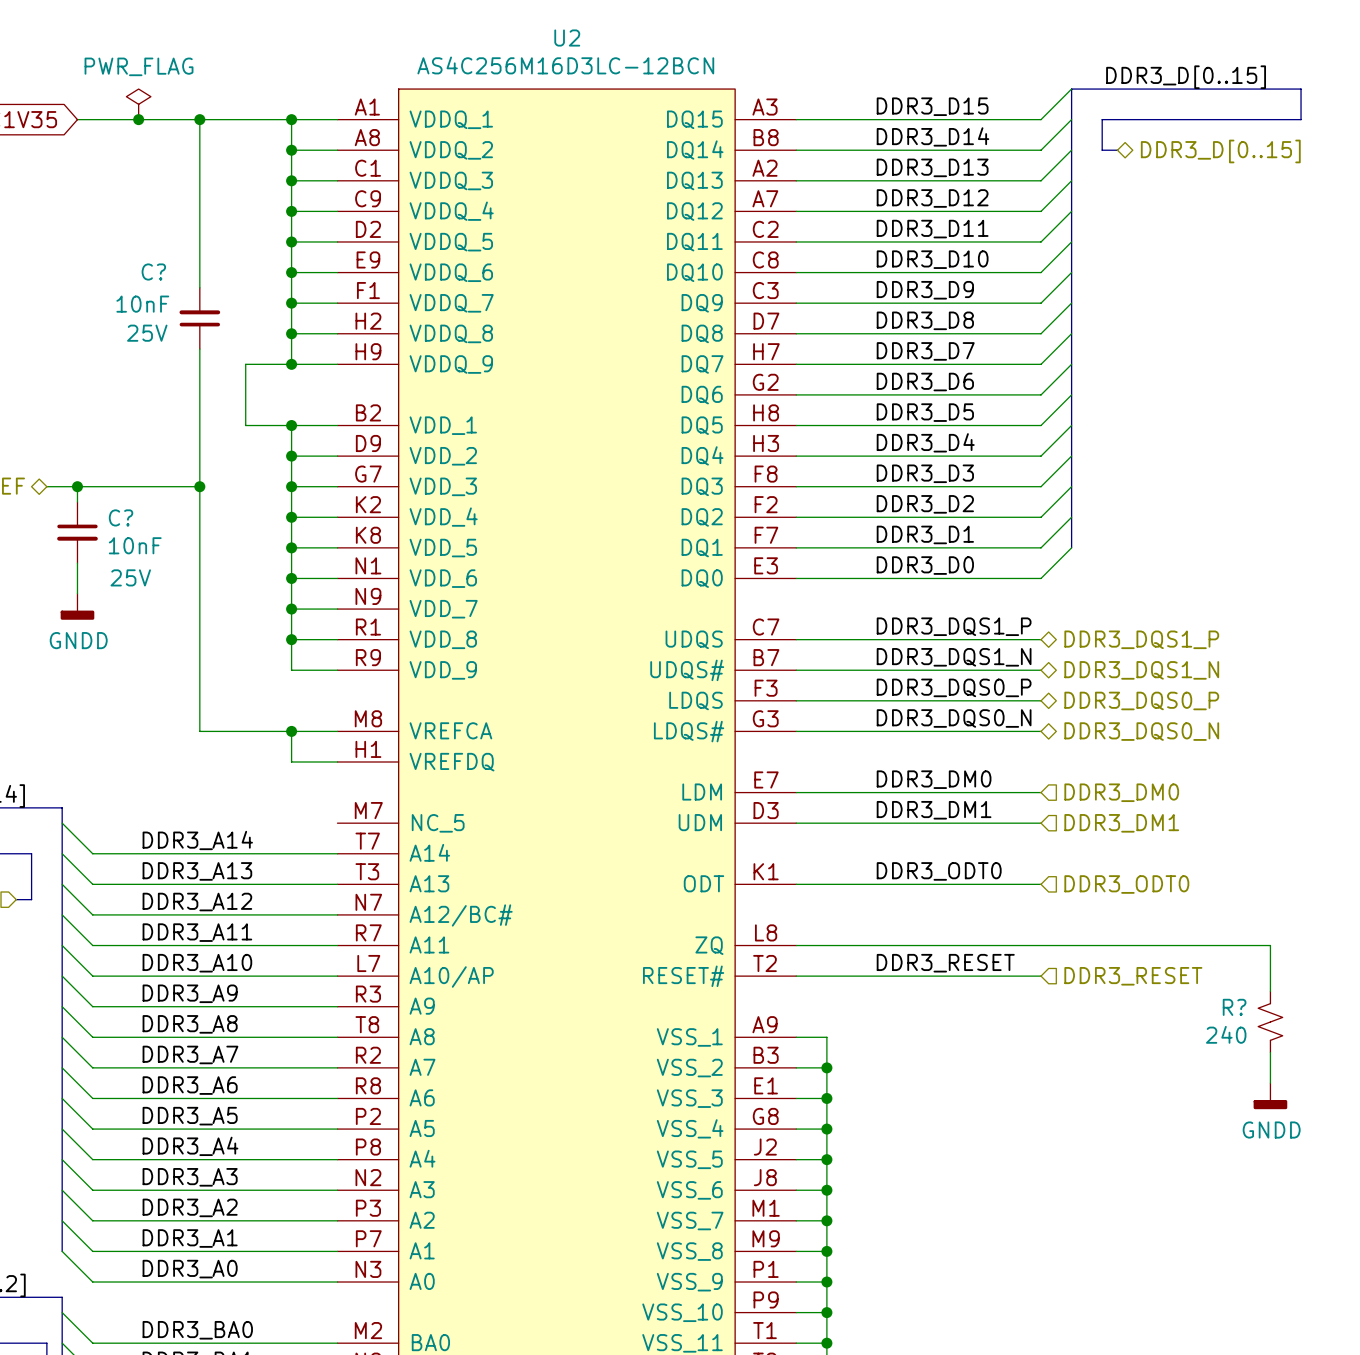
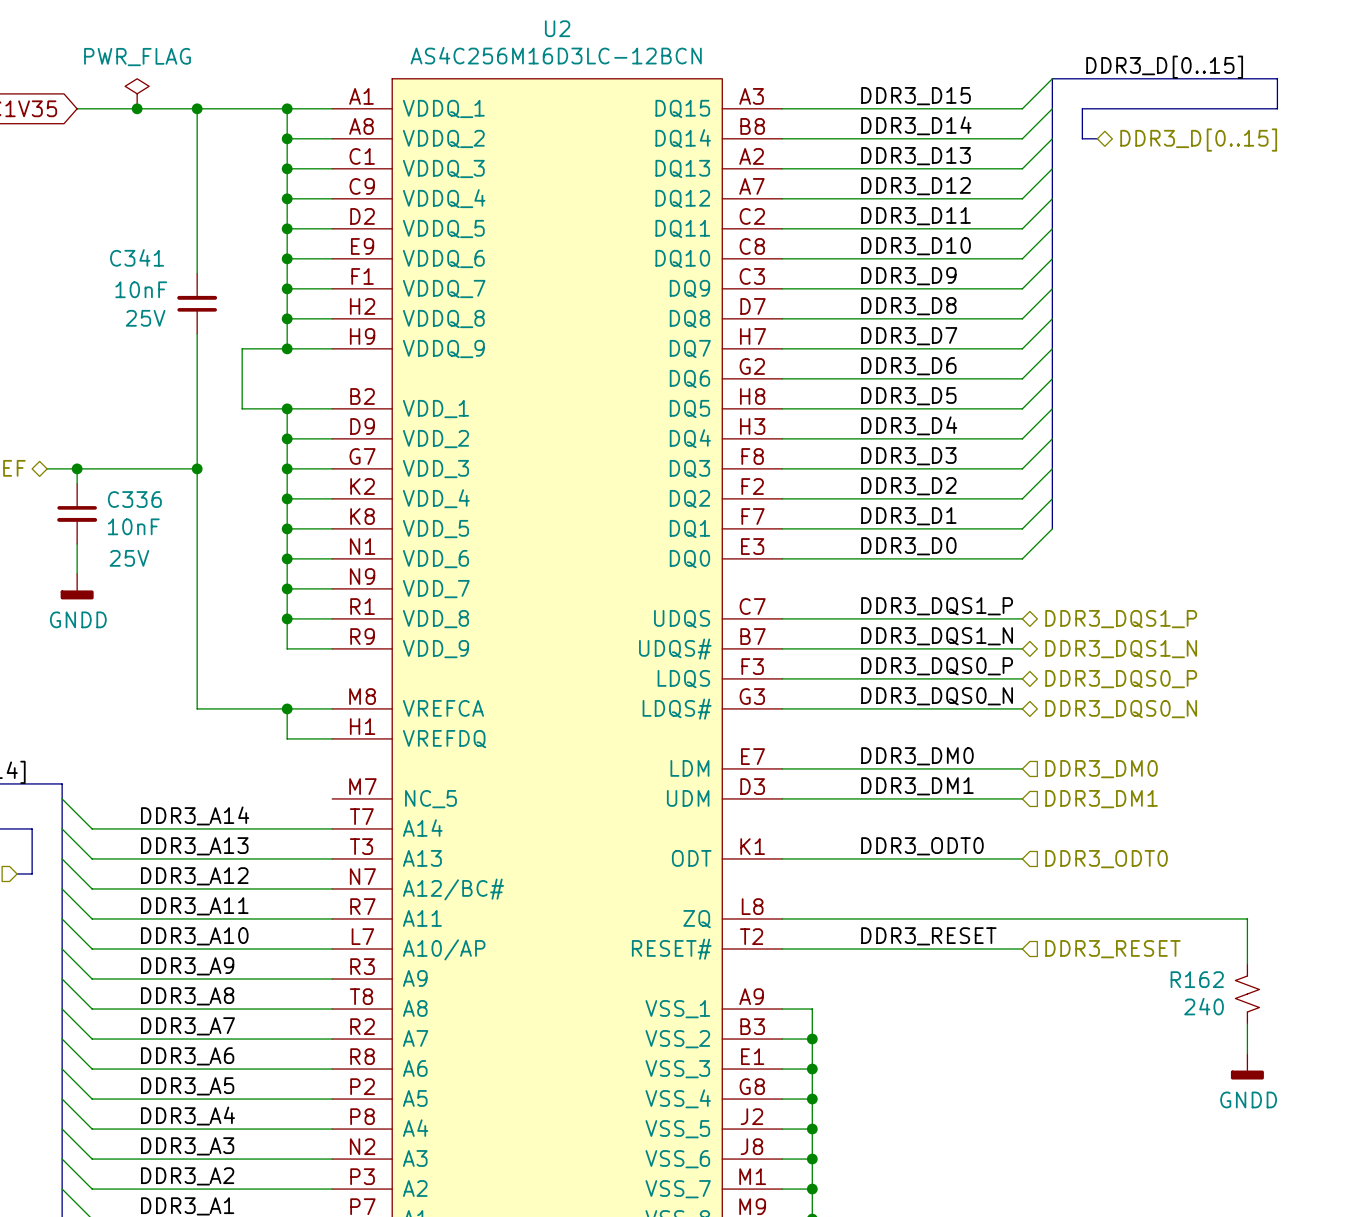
C? name: C? (153, 272) -> C341 (137, 257)
C? name: C? (121, 517) -> C336 (134, 499)
R? name: R? (1234, 1007) -> R162 (1197, 979)

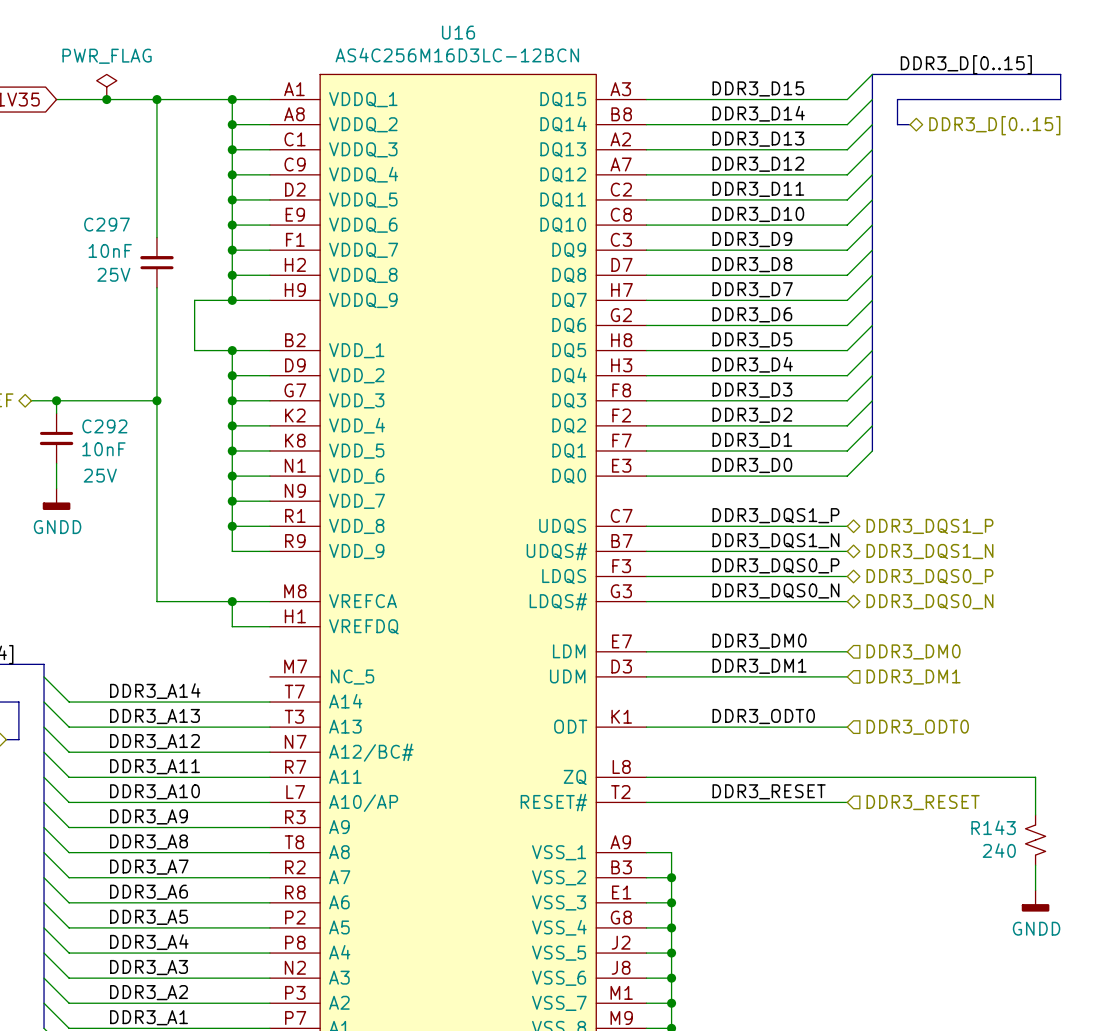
U2 name: U2 (557, 28) -> U16 (458, 32)
C341 name: C341 (137, 257) -> C297 (106, 224)
C336 name: C336 (134, 499) -> C292 (104, 426)
R162 name: R162 (1197, 979) -> R143 (993, 827)

